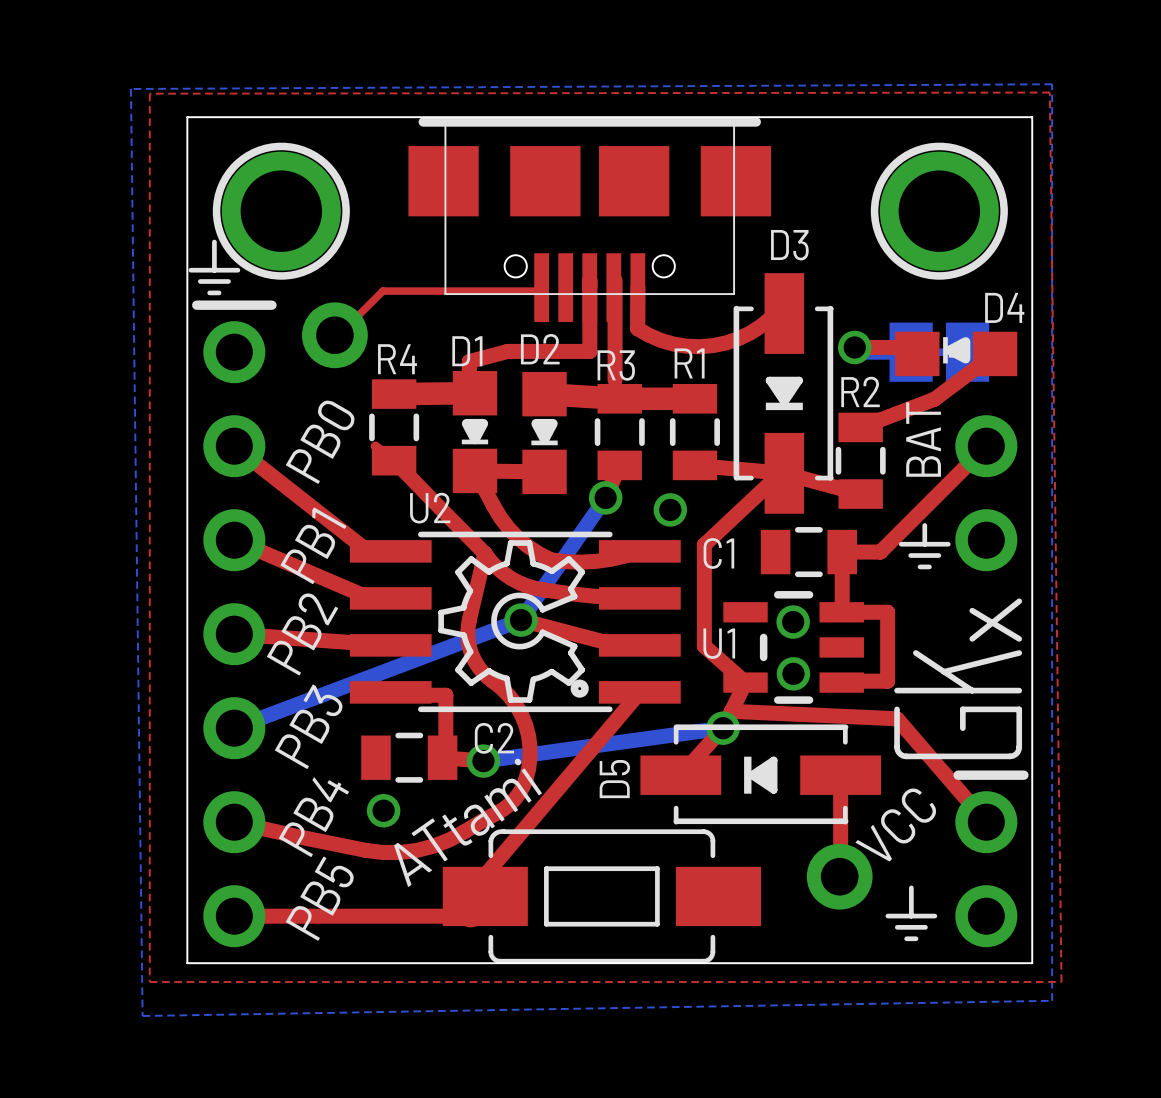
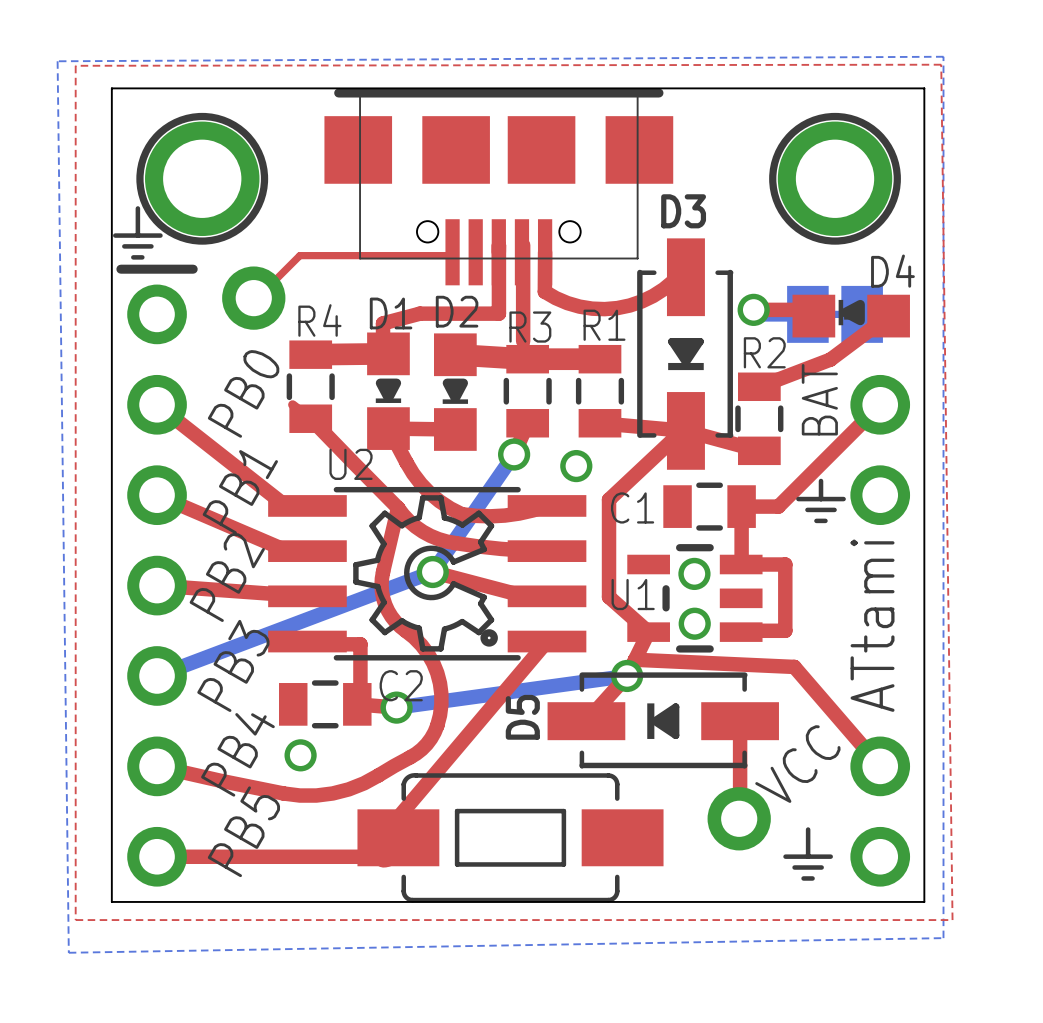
line: (1019, 601) (972, 638) -> none
line: (972, 610) (1019, 638) -> none
line: (915, 652) (972, 690) -> none
line: (1019, 652) (944, 671) -> none
line: (897, 690) (1019, 690) -> none
line: (897, 709) (897, 748) (902, 755) (1009, 756) (1014, 755) (1018, 750) (1019, 709) (962, 709) (962, 728) -> none
line: (958, 775) (1023, 775) -> none
text rotation: 0° (468, 822) -> 55° counterclockwise (872, 625)
text position: ATtami (468, 822) -> ATtami (872, 625)

